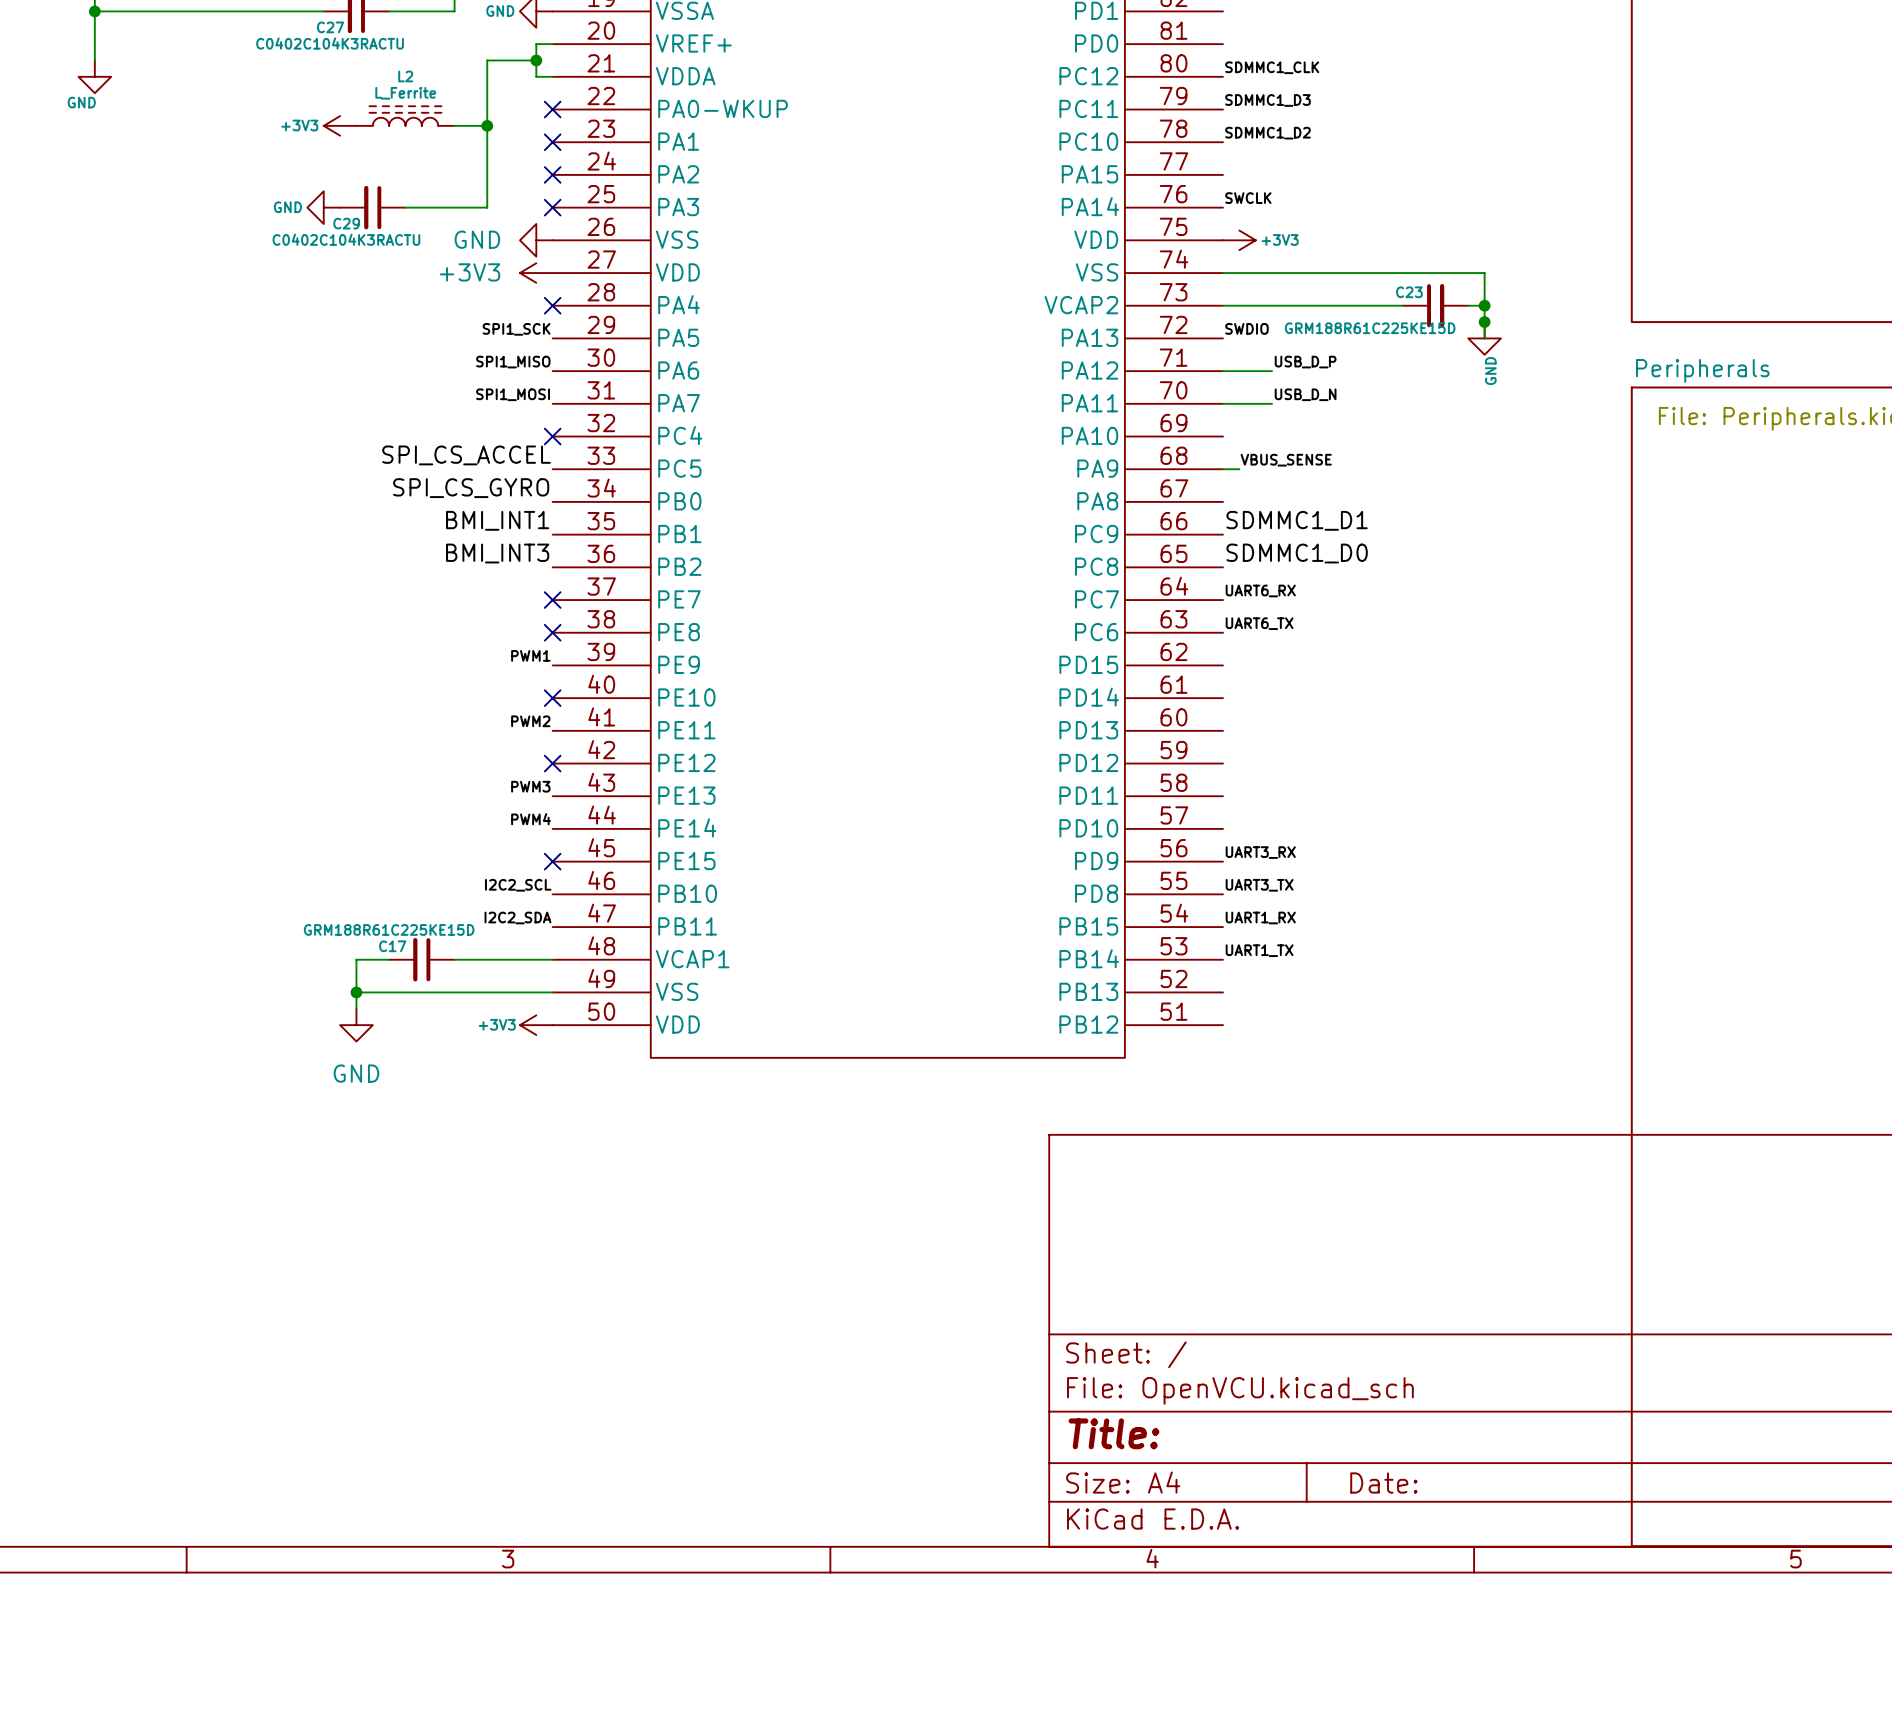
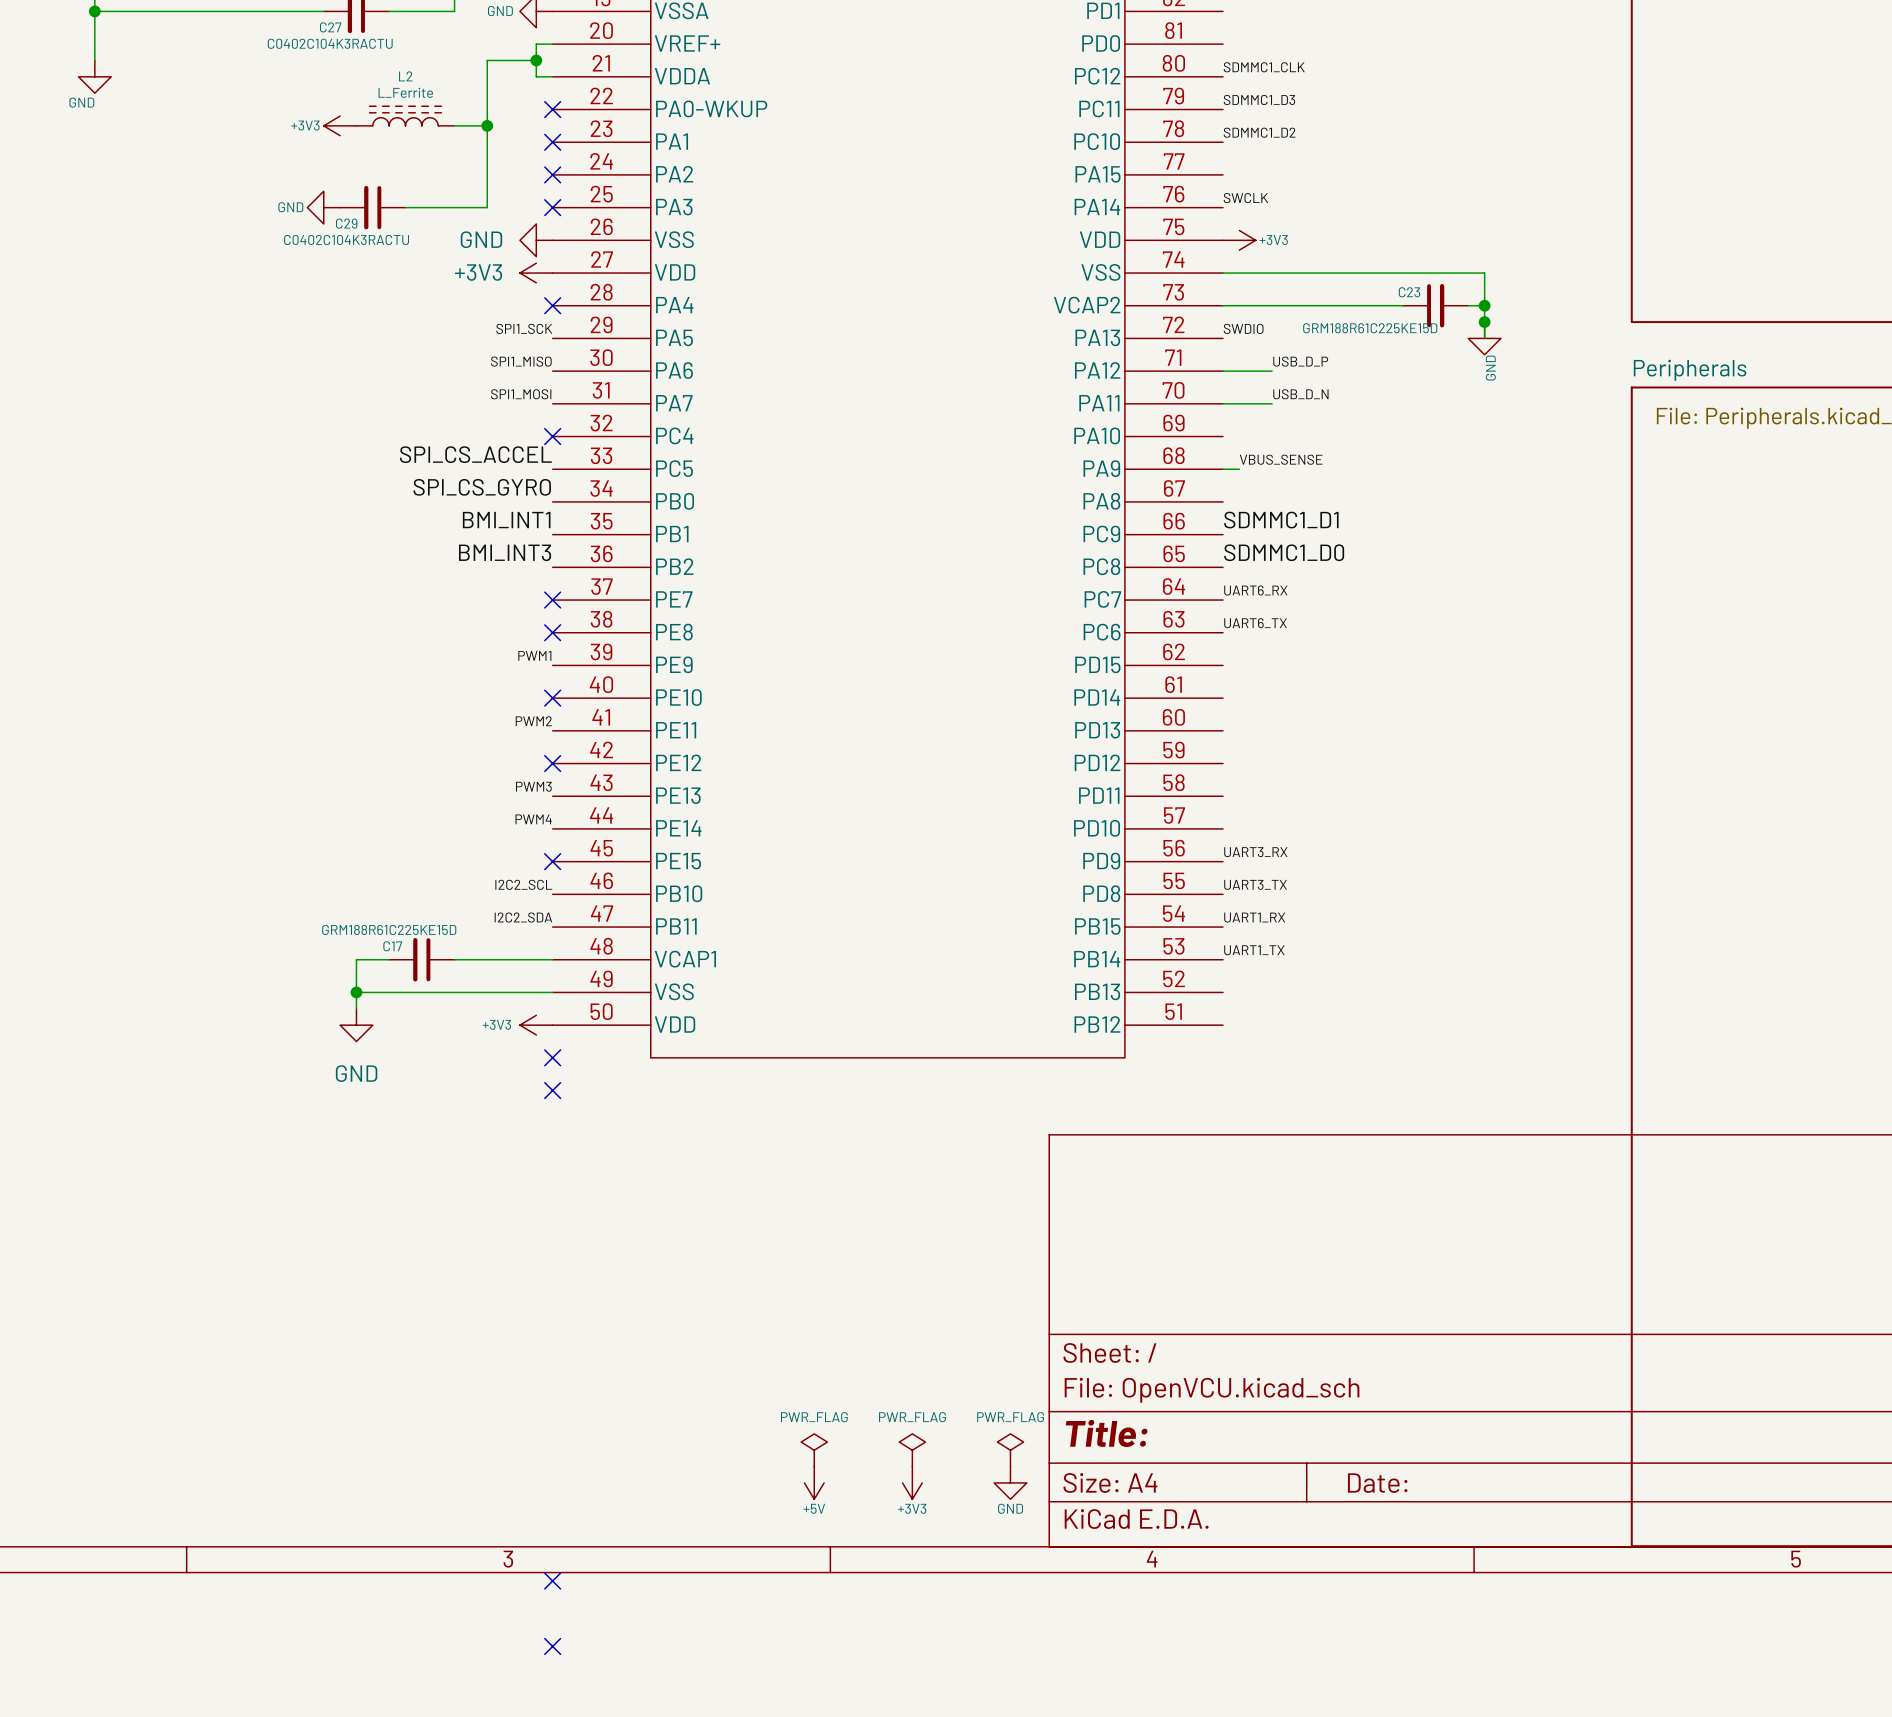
no-connect mark: none -> (552, 1057)
no-connect mark: none -> (552, 1090)
power symbol: none -> PWR_FLAG (814, 1450)
power symbol: none -> PWR_FLAG (912, 1450)
power symbol: none -> PWR_FLAG (1010, 1450)
power symbol: none -> +5V (814, 1482)
power symbol: none -> +3V3 (912, 1482)
power symbol: none -> GND (1010, 1482)
no-connect mark: none -> (552, 1581)
no-connect mark: none -> (552, 1646)

